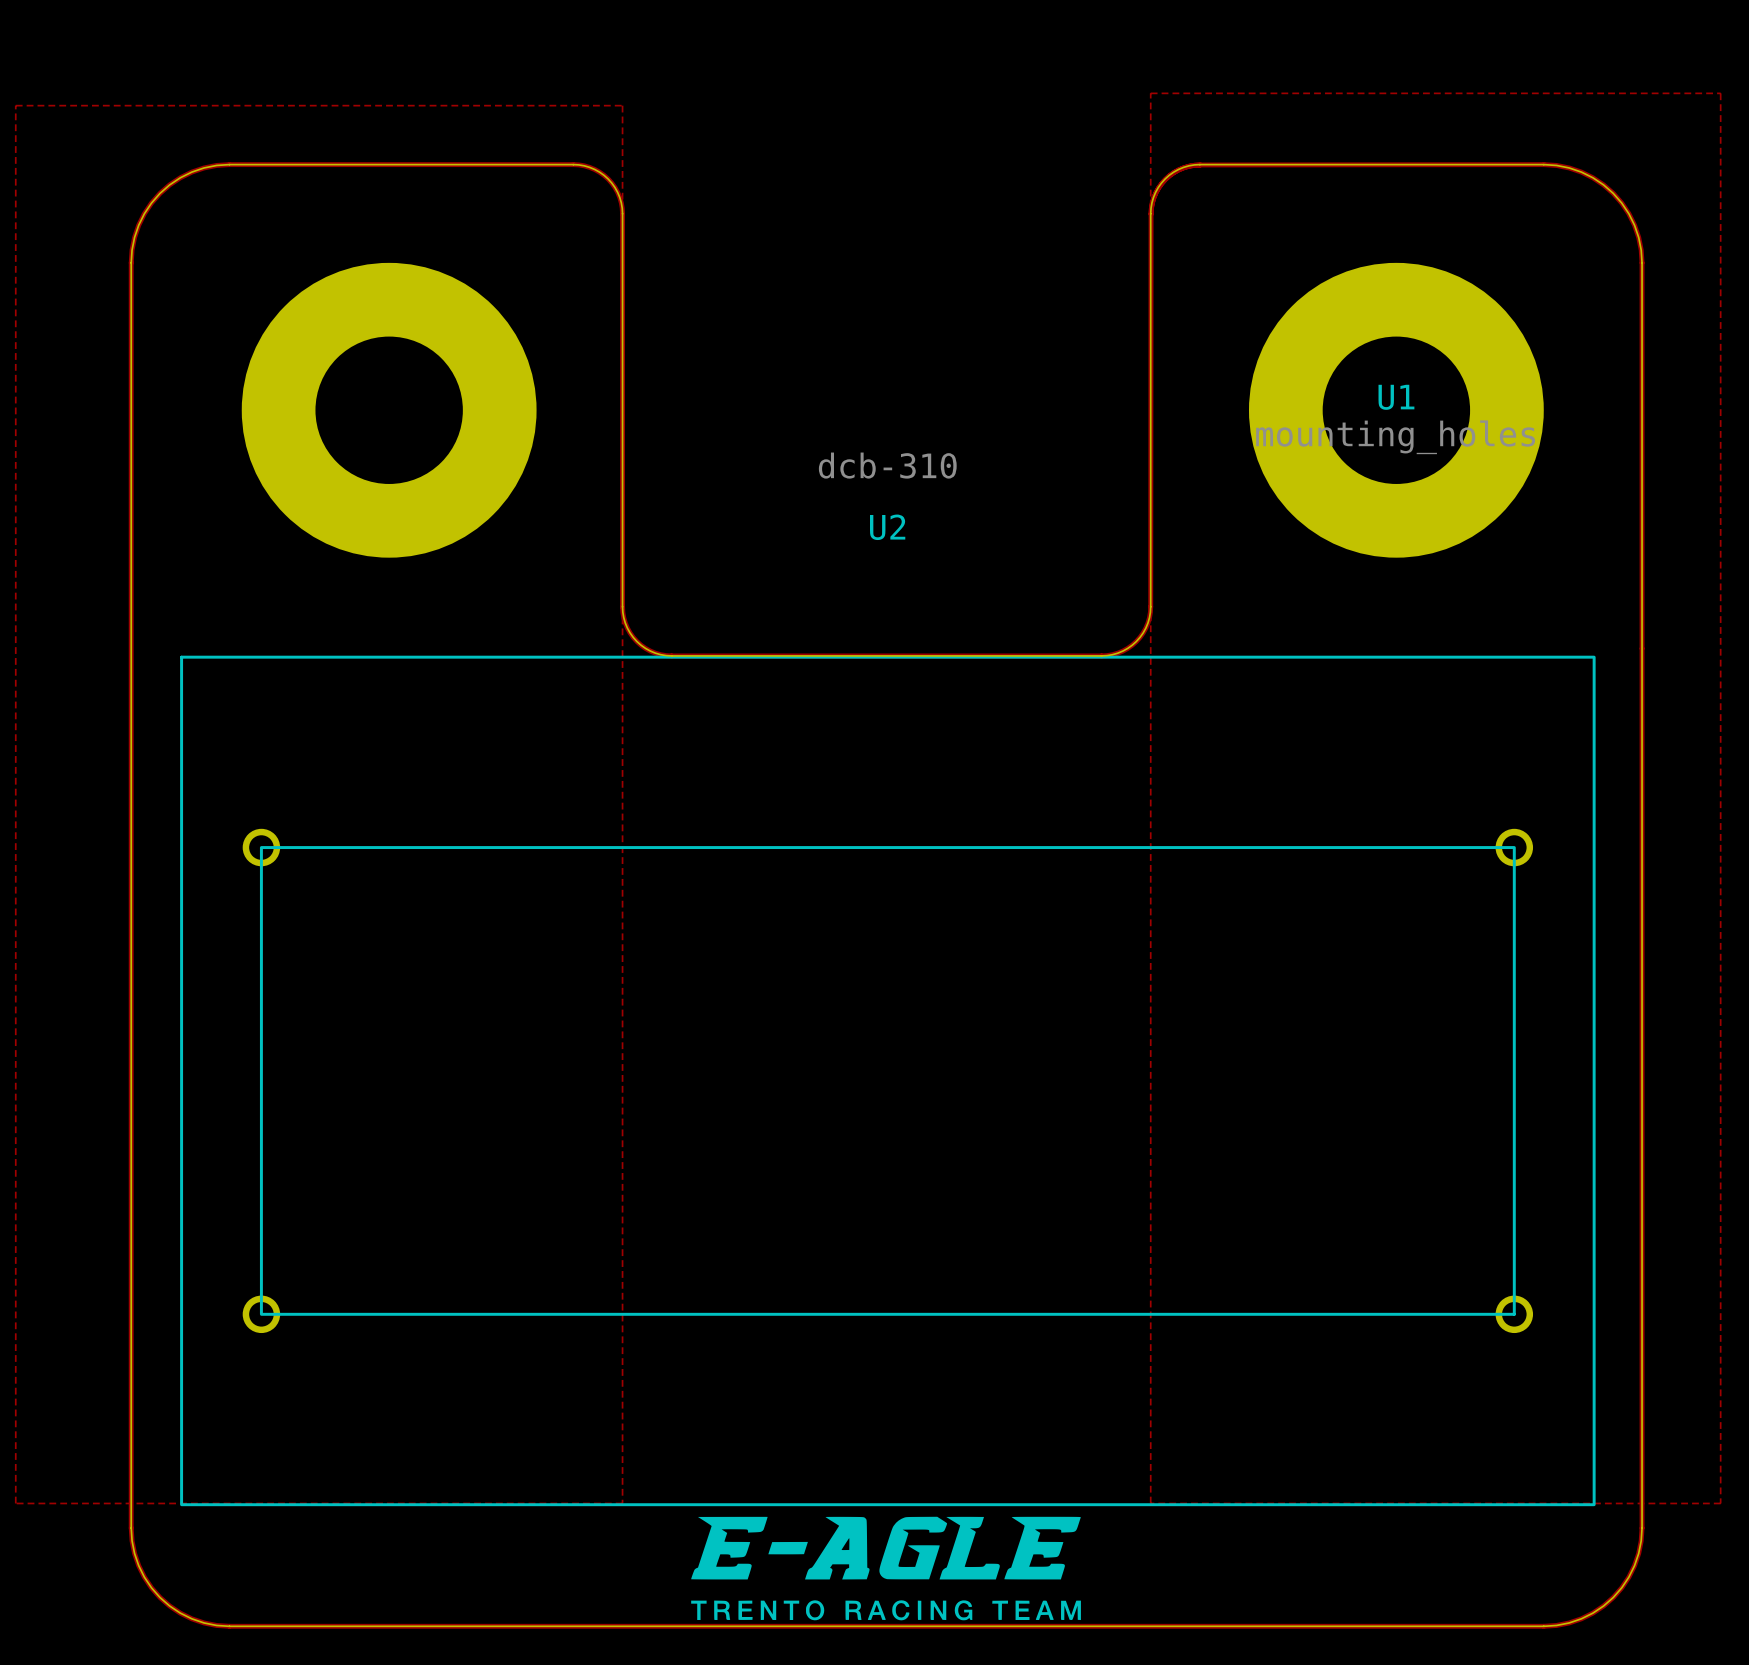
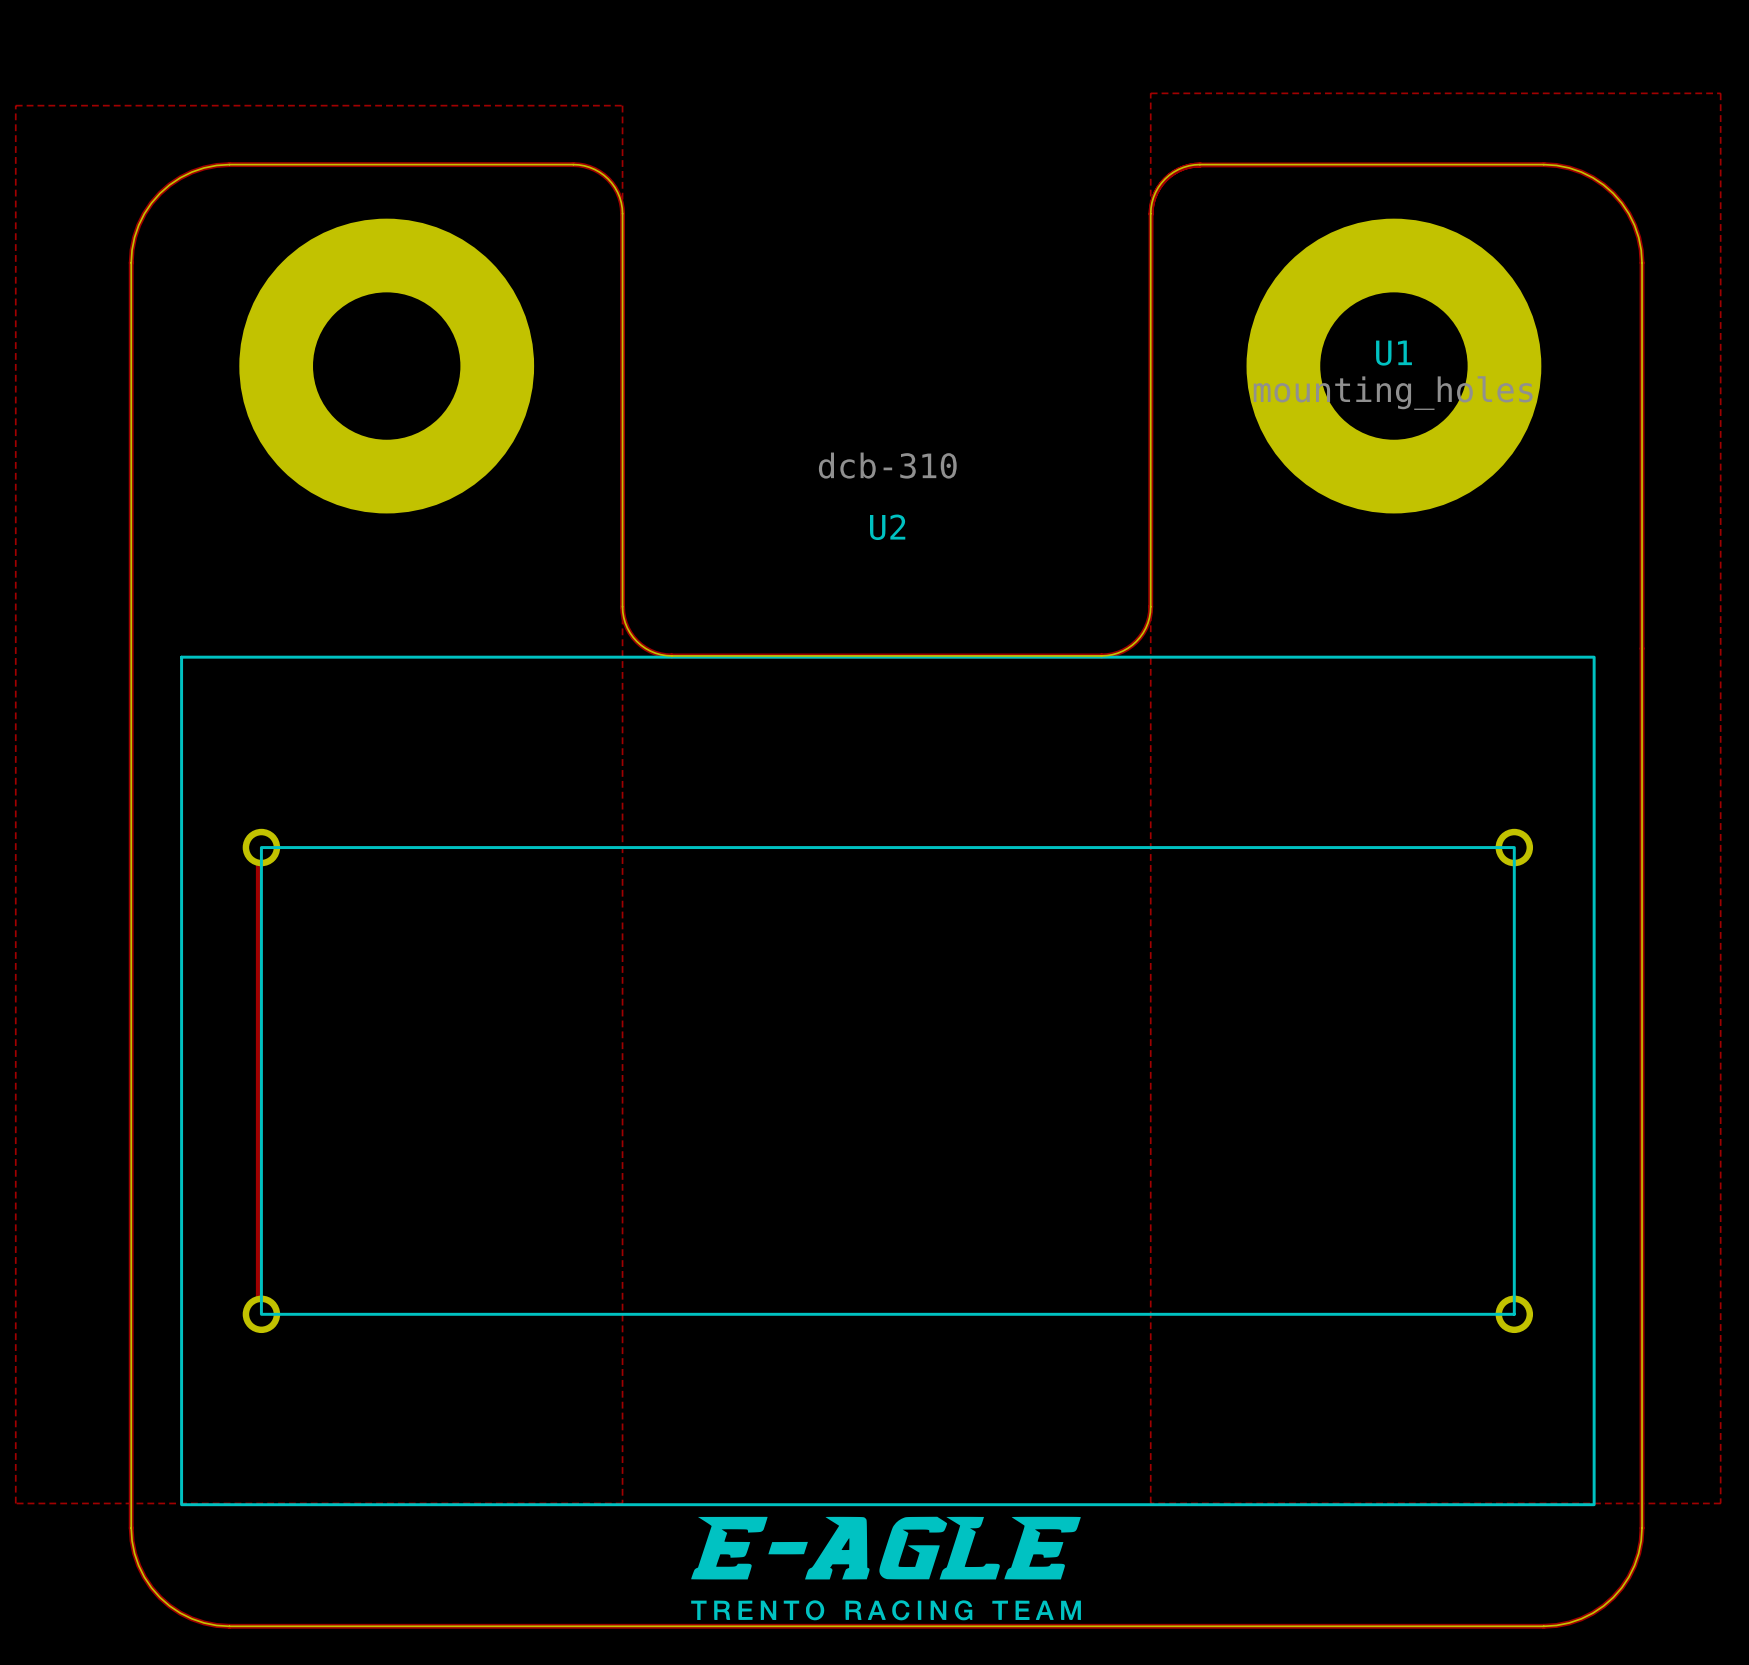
U1 position: (892, 410) -> (890, 366)
track: none -> (258, 847) (258, 1314)

